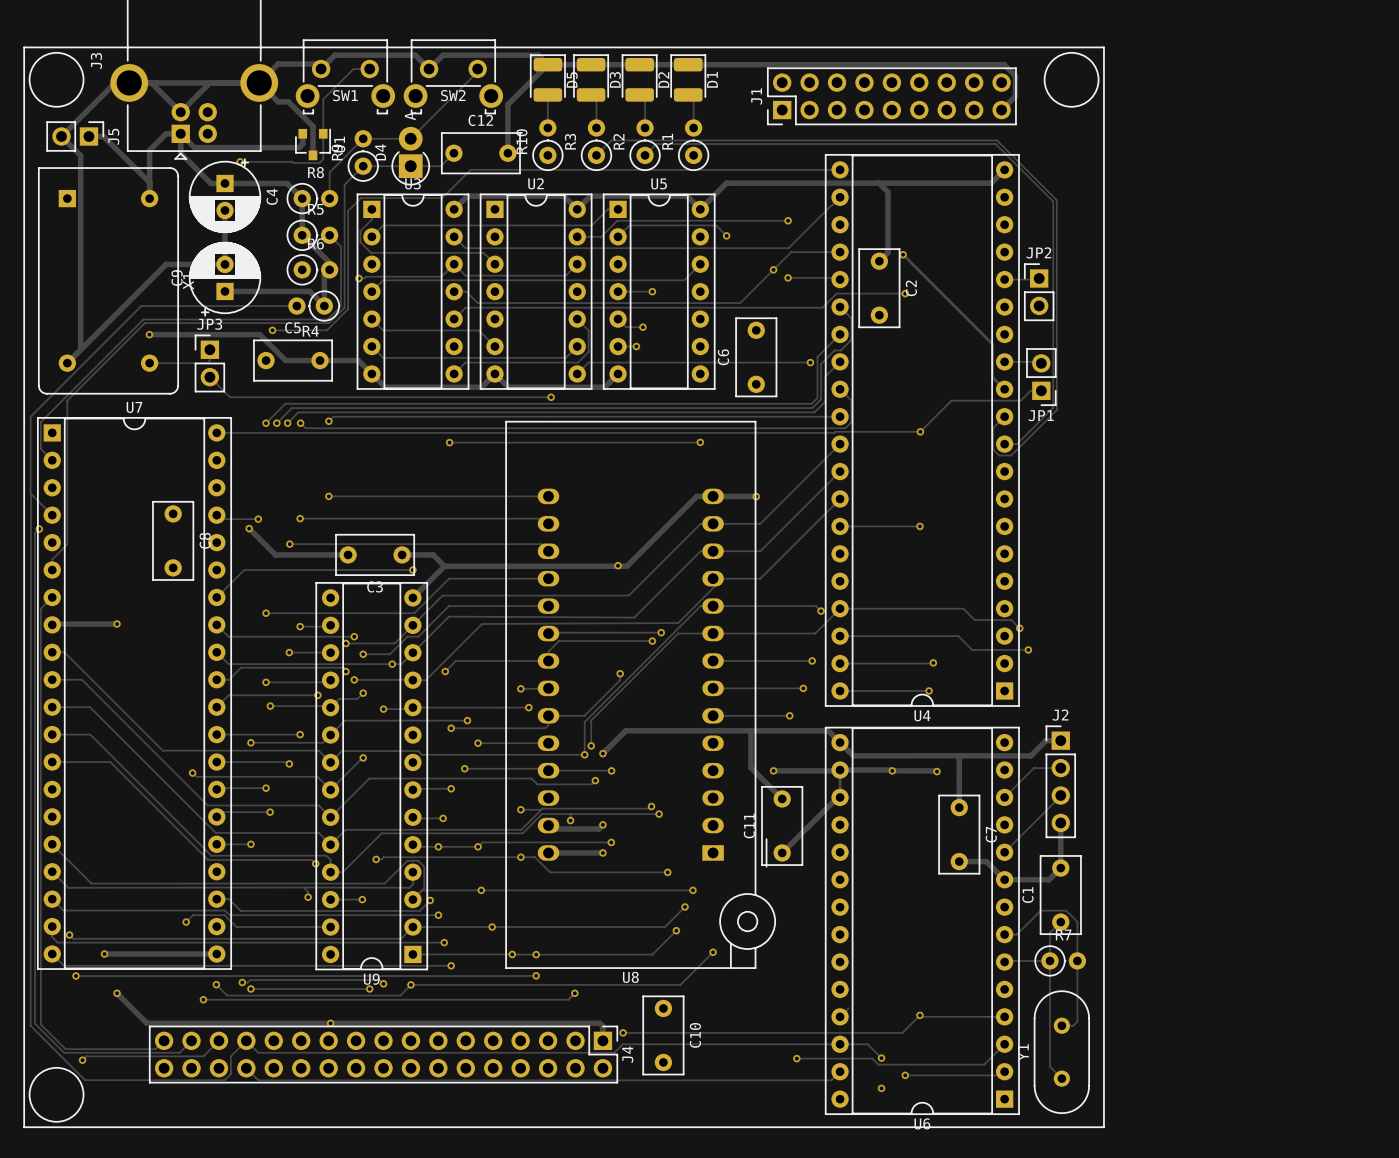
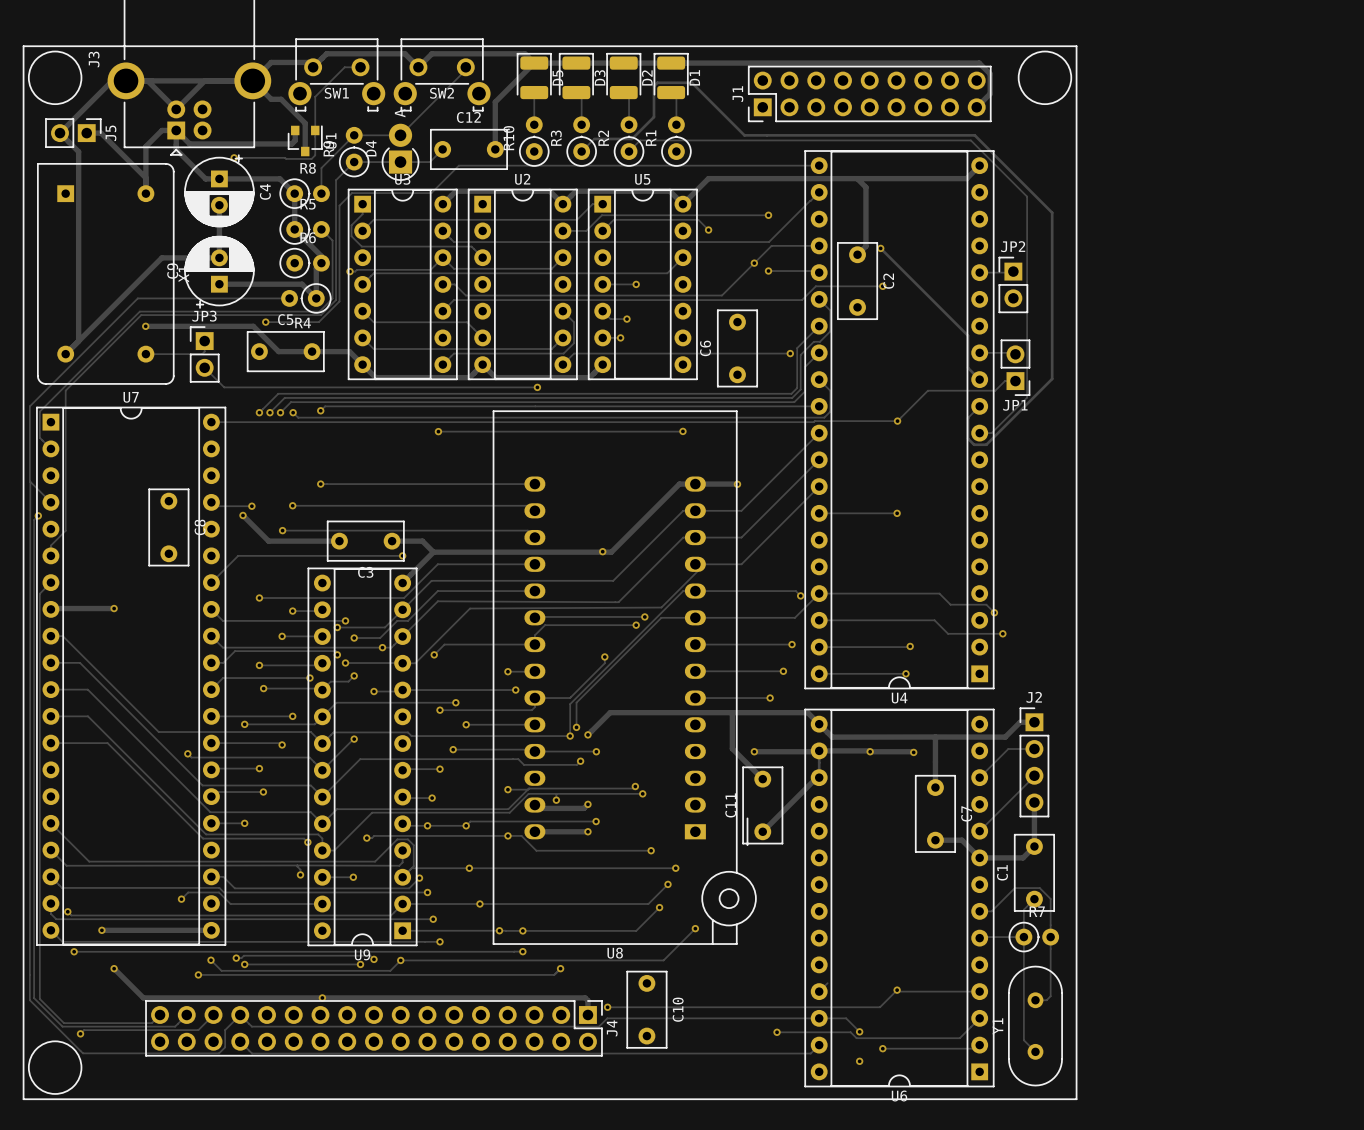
track: none -> (766, 135) (744, 135) (691, 82) (657, 82) (653, 86) (653, 117) (632, 138) (594, 138)
track: (609, 142) (611, 140) (997, 140) (1056, 200) (1056, 409) (1011, 455) (999, 455) (993, 449) (993, 428) -> (767, 135) (974, 135) (1052, 212) (1052, 378) (986, 444) (974, 444) (968, 438) (968, 417)

